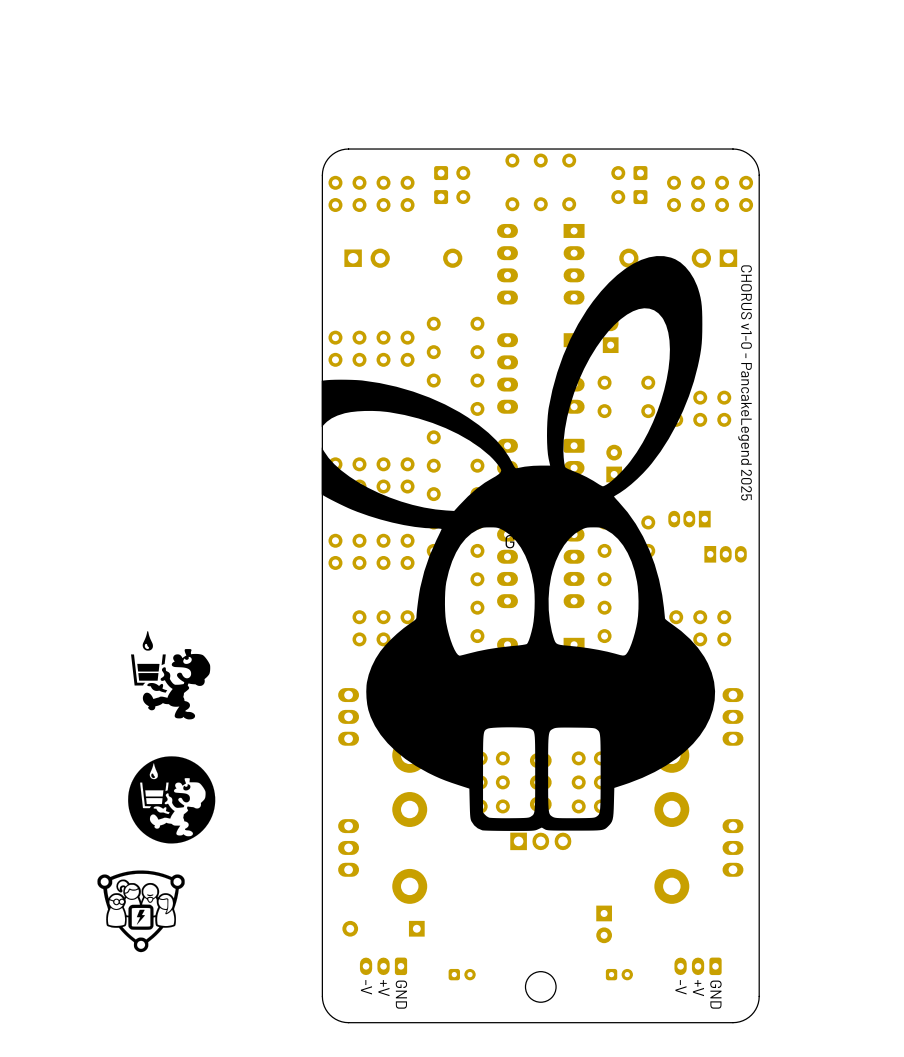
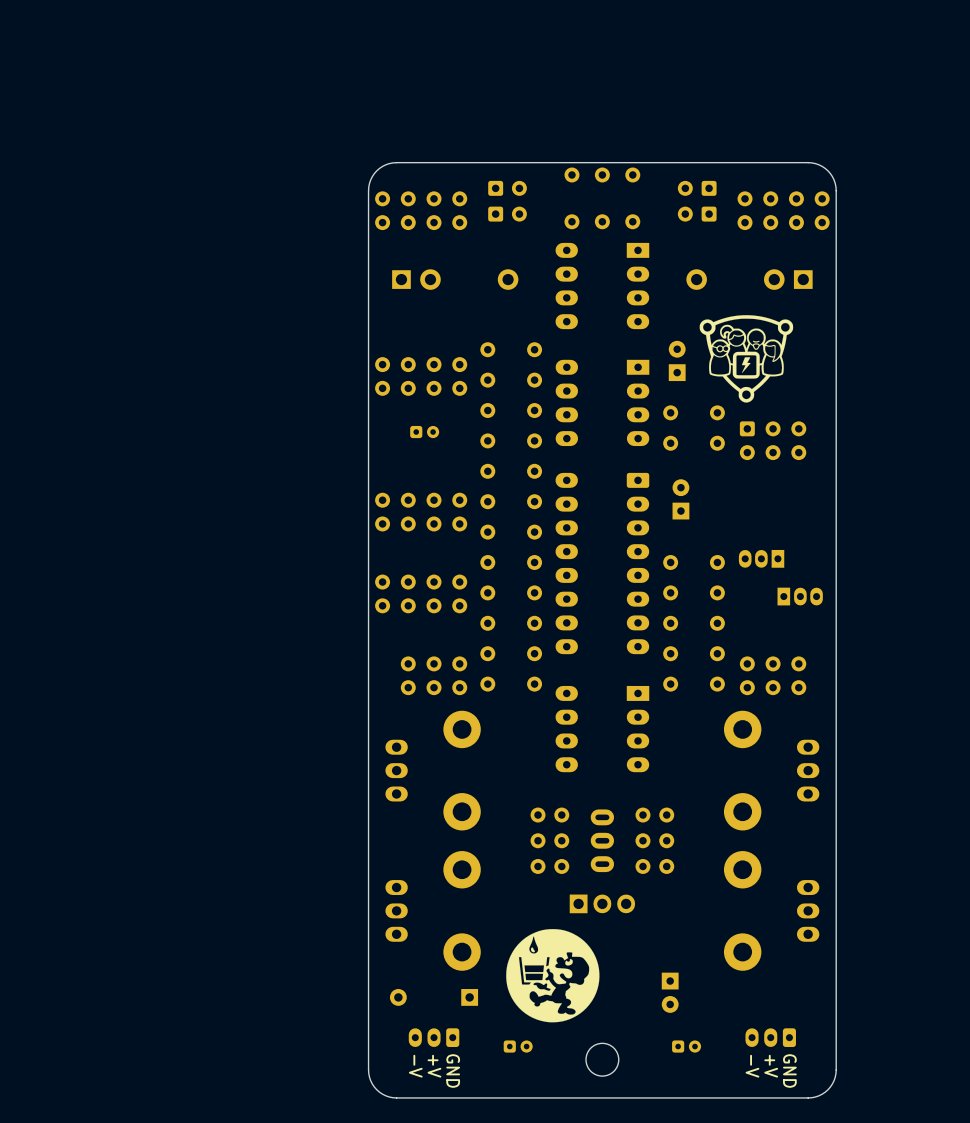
drawing: none -> [699, 315, 794, 403]
text: CHORUS v1-0 - PancakeLegend 2025 (745, 382) -> none
part: (518, 543) -> none
drawing: [131, 631, 211, 720] -> none
drawing: [128, 756, 216, 844] -> none
drawing: none -> [506, 929, 600, 1023]
drawing: [97, 870, 185, 953] -> none

